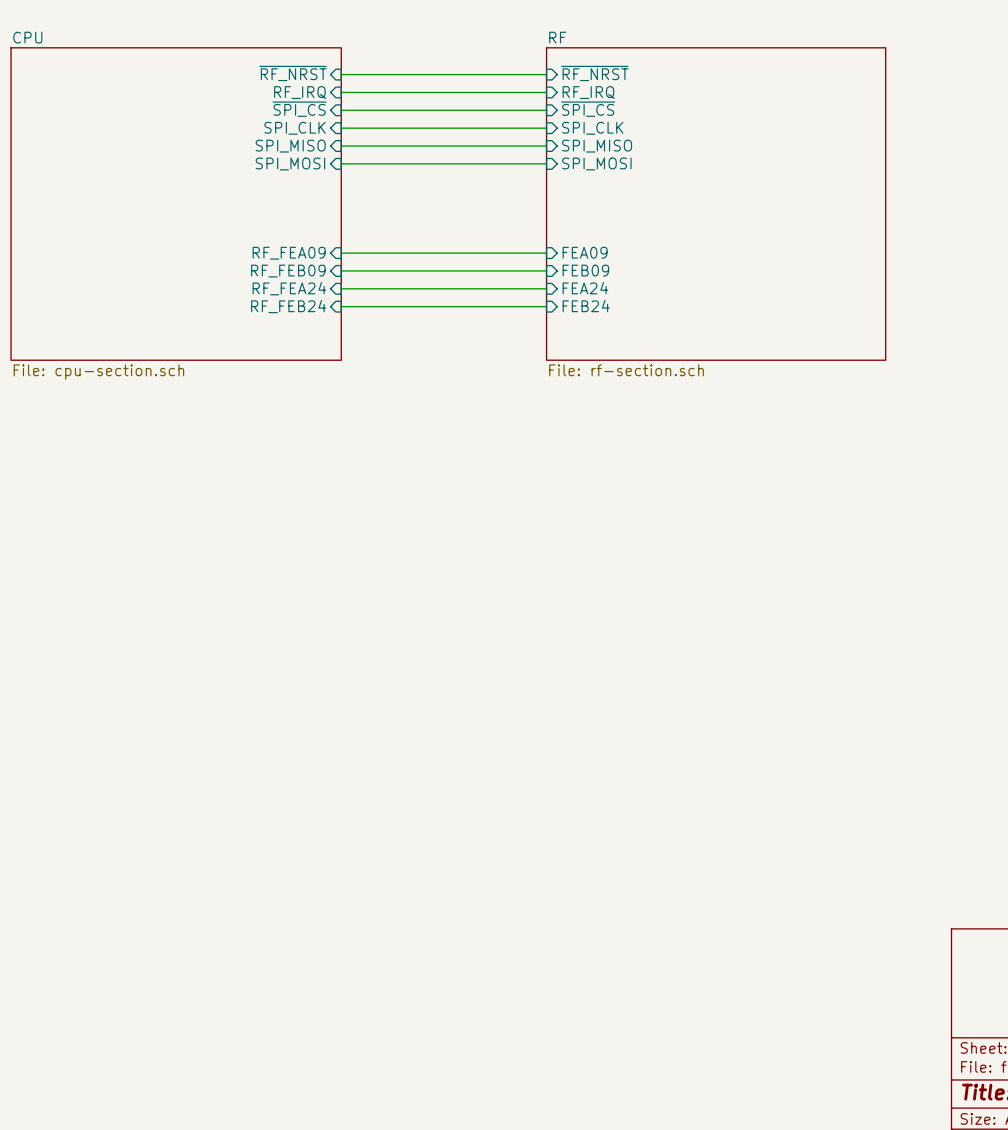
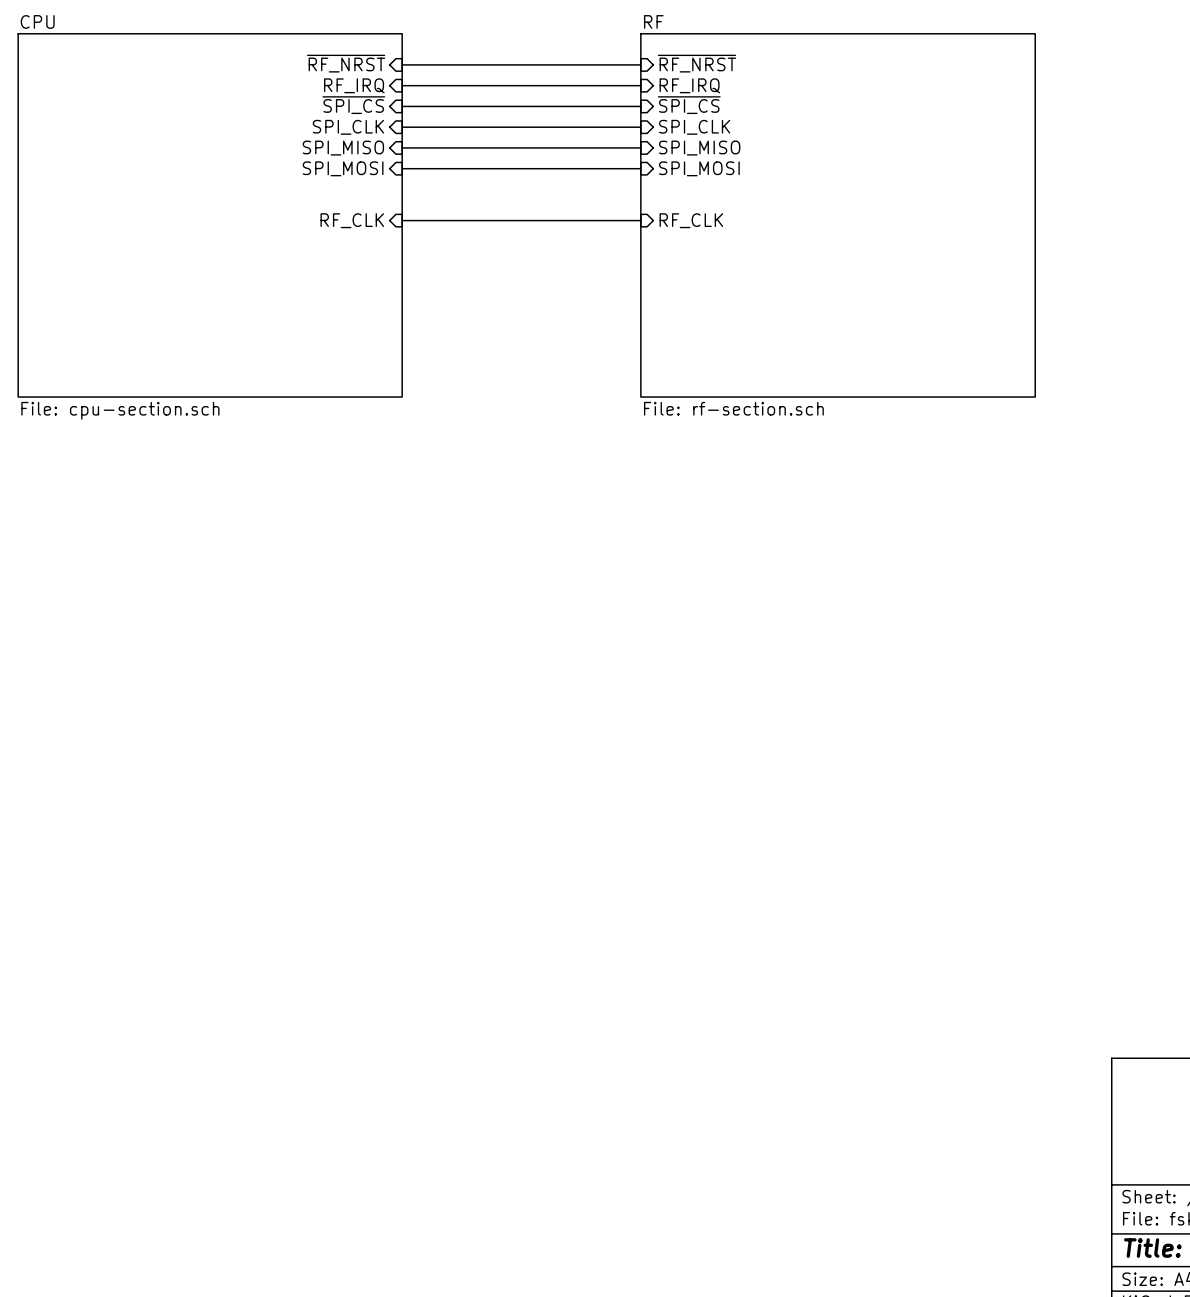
sheet pin: none -> RF_CLK (352, 220)
sheet pin: none -> RF_CLK (691, 220)
sheet pin: FEA09 (585, 252) -> none
sheet pin: RF_FEA09 (289, 253) -> none
wire: (341, 253) (546, 253) -> (402, 220) (640, 220)
wire: (341, 270) (546, 270) -> none
sheet pin: FEB09 (585, 270) -> none
sheet pin: RF_FEB09 (288, 271) -> none
sheet pin: RF_FEA24 (289, 288) -> none
wire: (341, 288) (546, 288) -> none
sheet pin: FEA24 (585, 288) -> none
sheet pin: RF_FEB24 (288, 306) -> none
wire: (341, 306) (546, 306) -> none
sheet pin: FEB24 (586, 306) -> none

